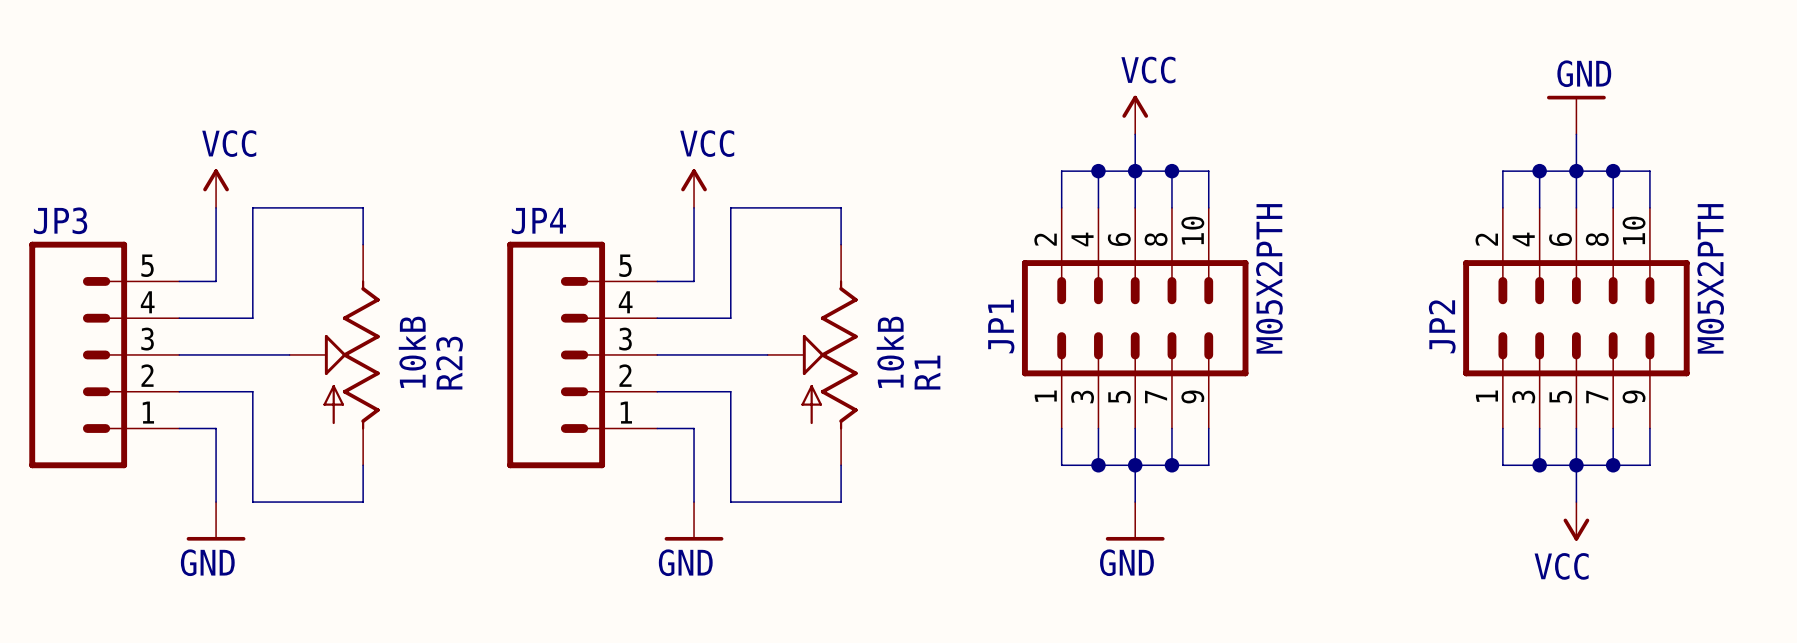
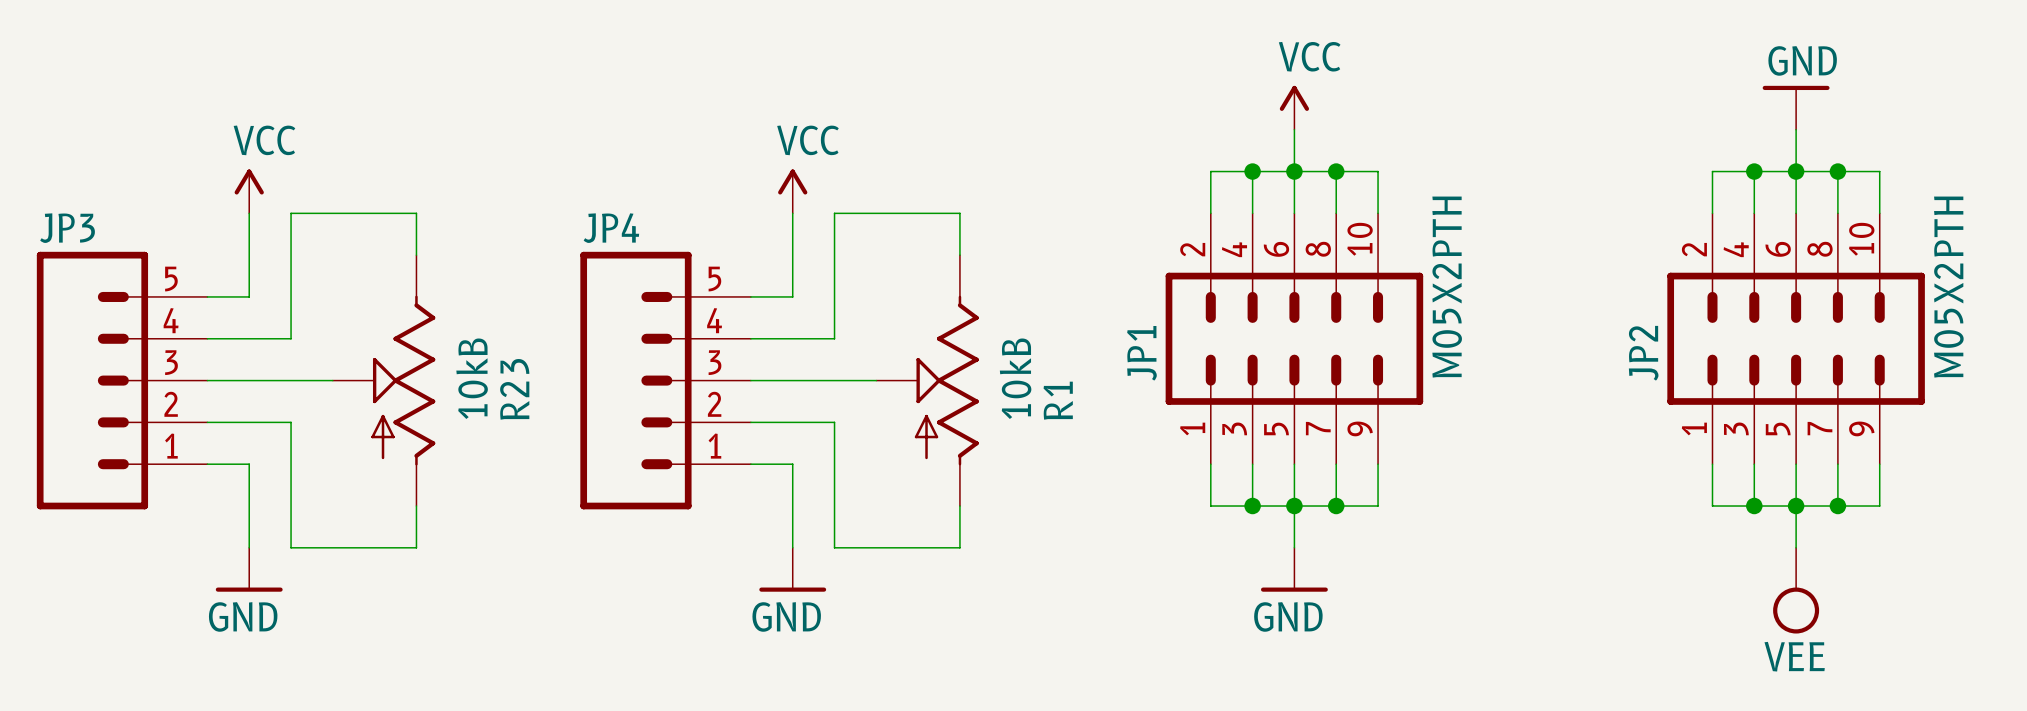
power symbol: VCC (1576, 521) -> none
power symbol: none -> VEE (1796, 590)

